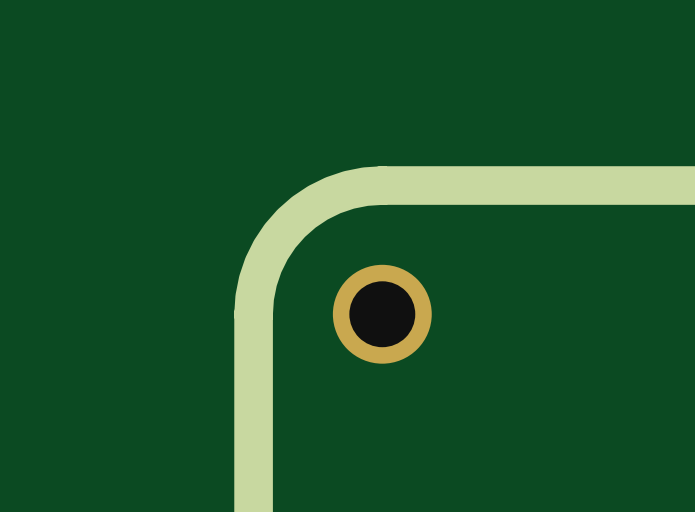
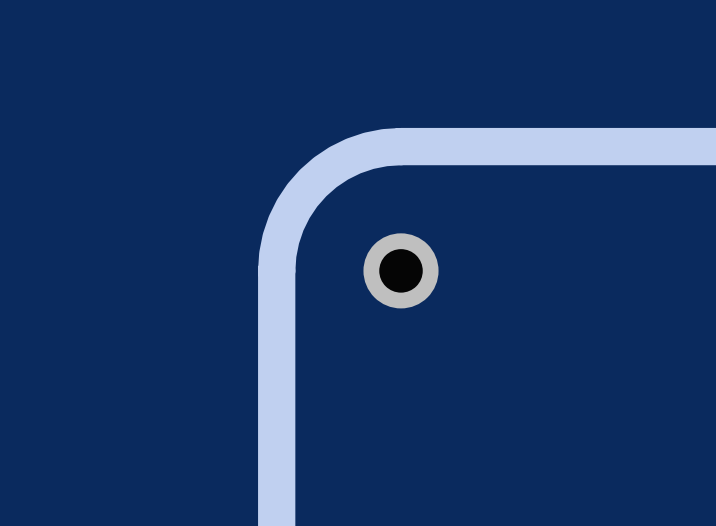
via size: [332, 264, 432, 364] -> [363, 233, 439, 309]

